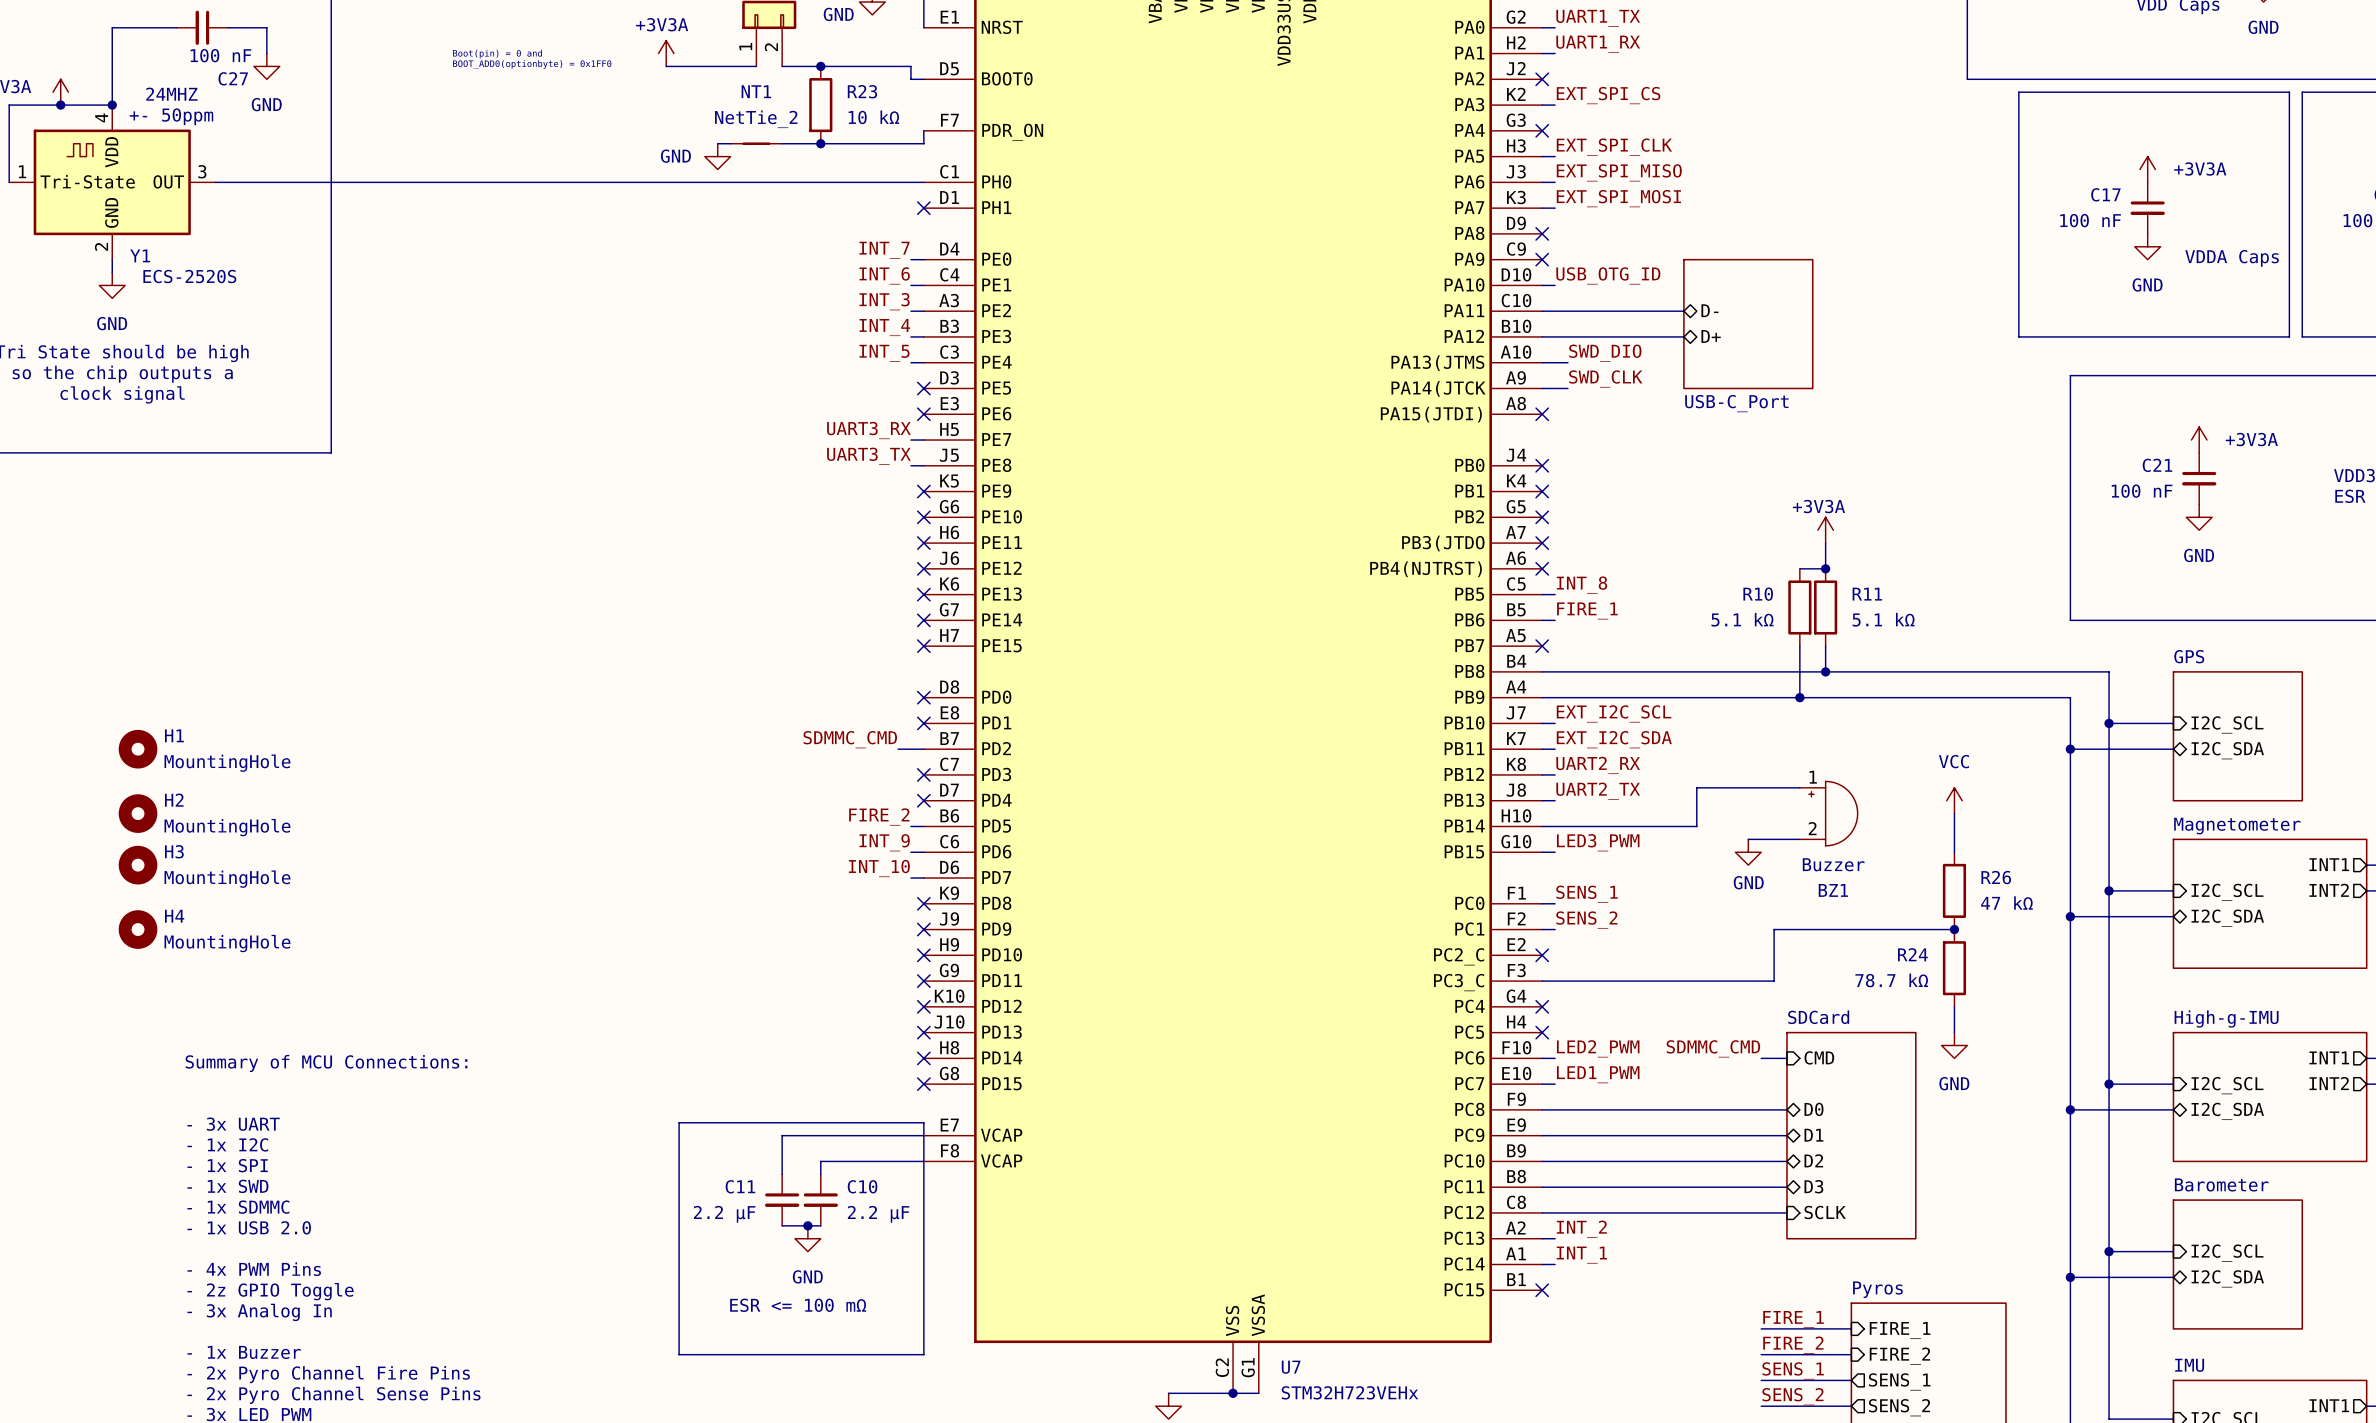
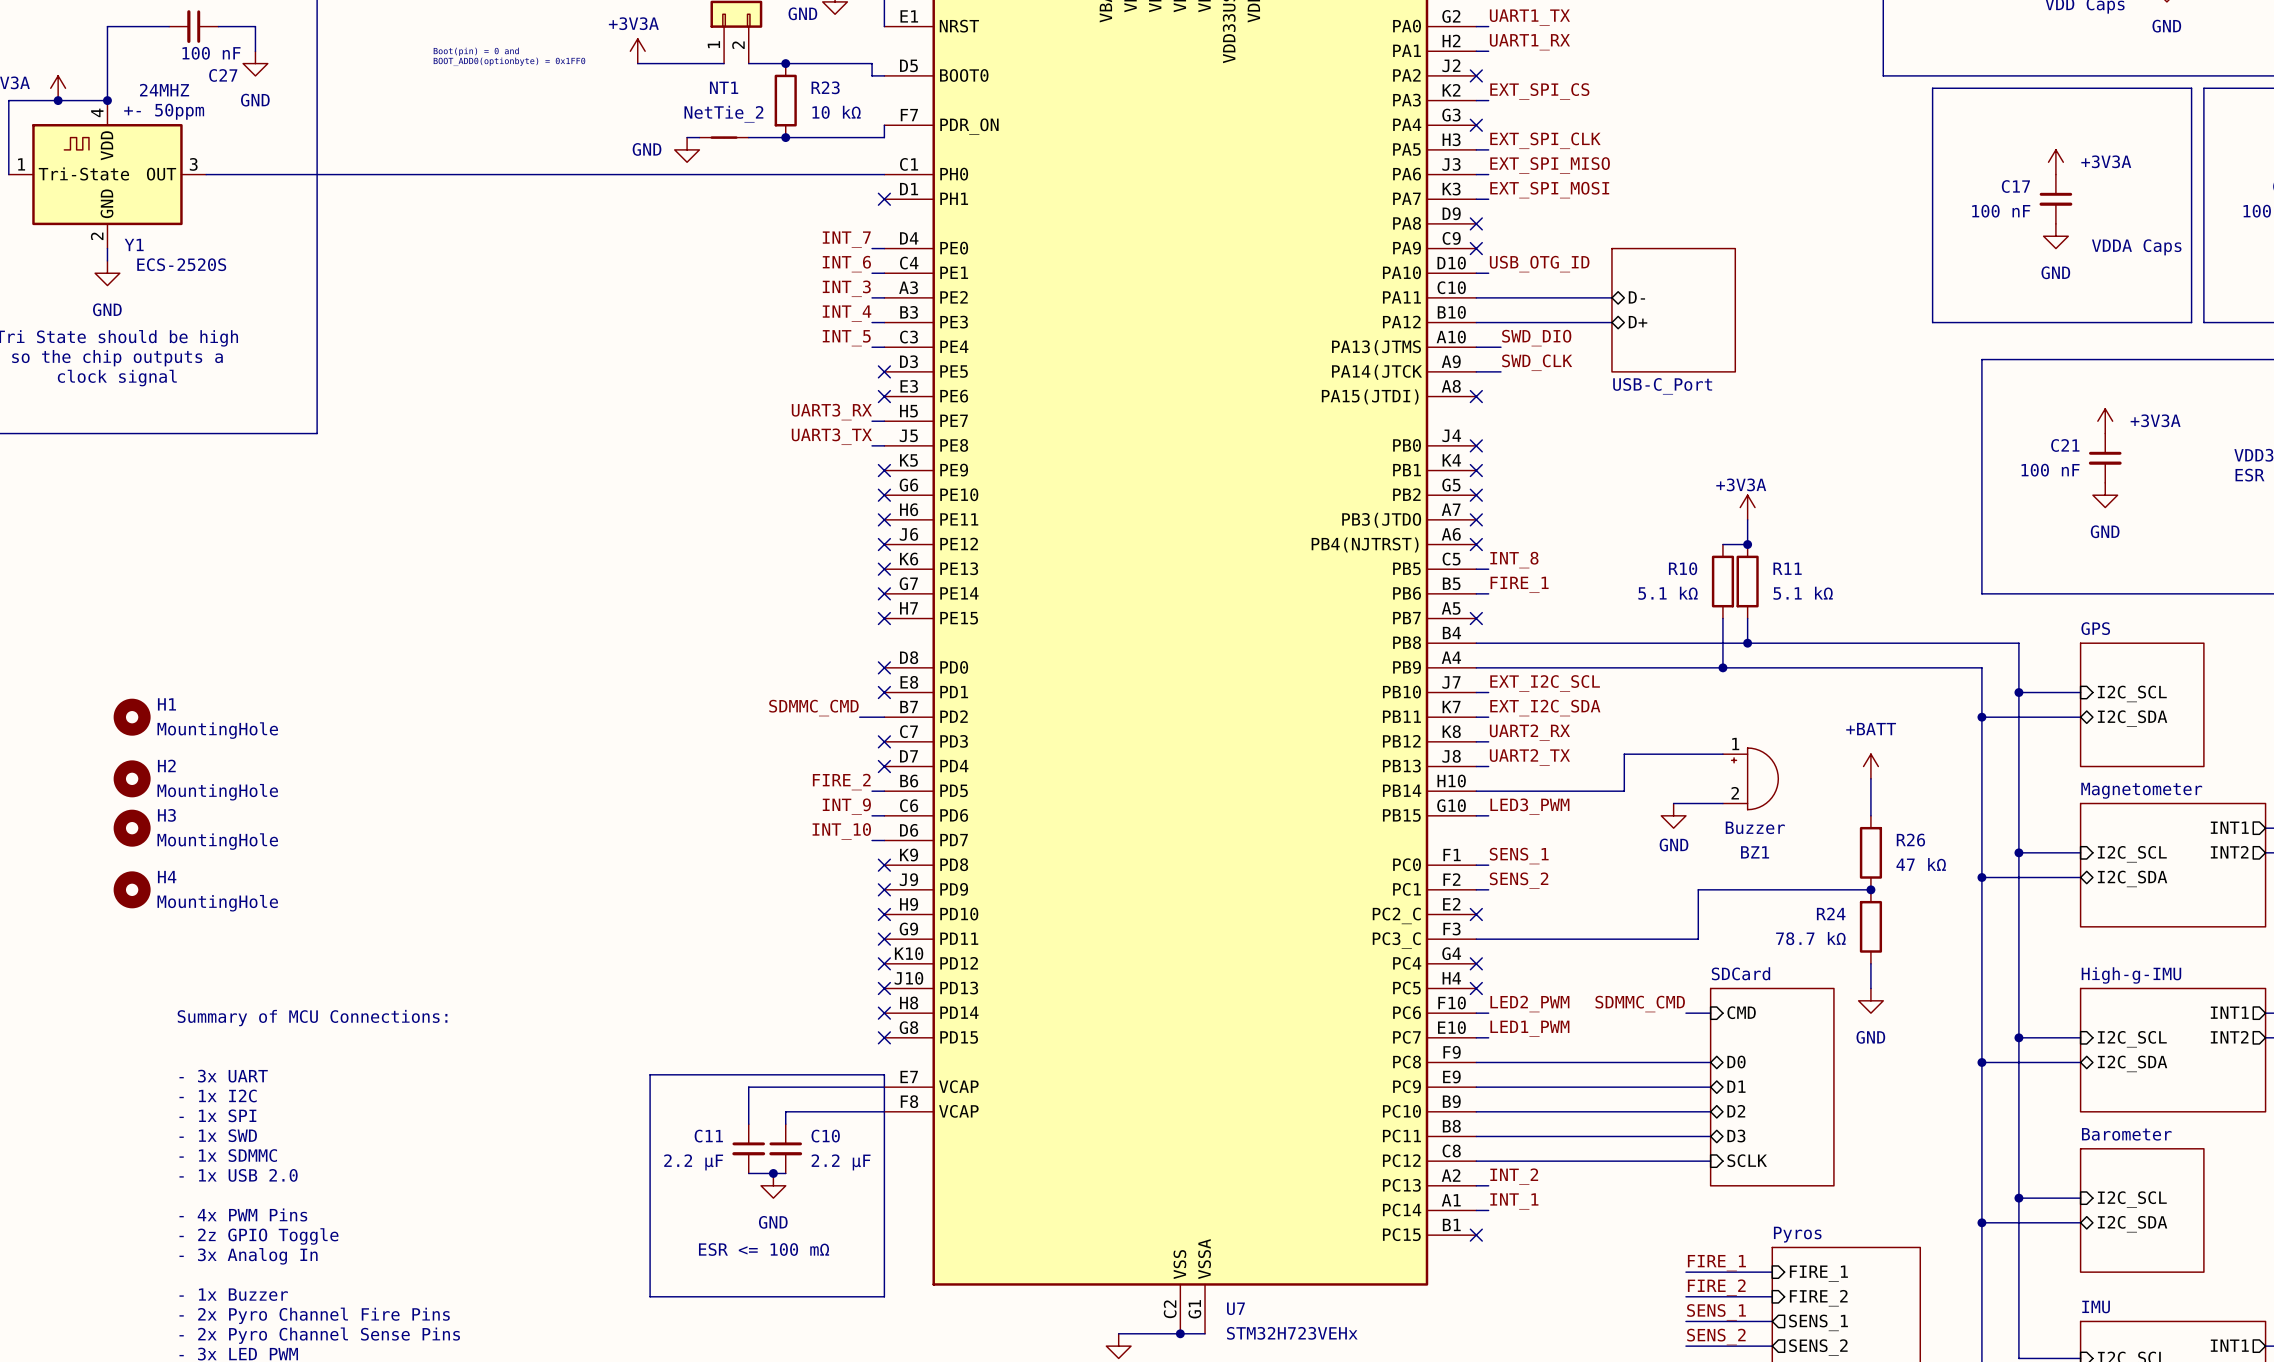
power symbol: VCC (1954, 800) -> +BATT (1870, 766)

